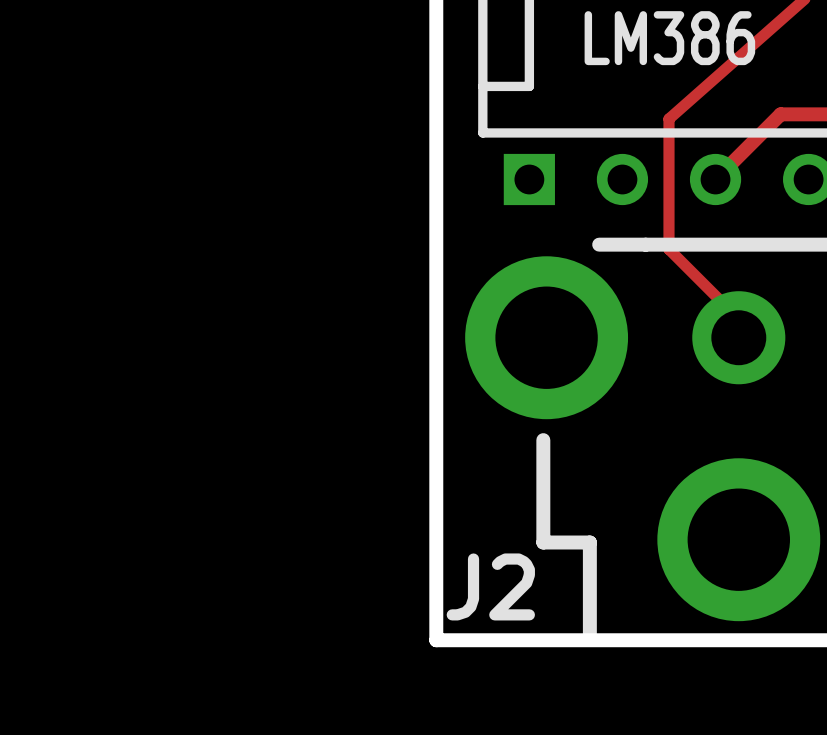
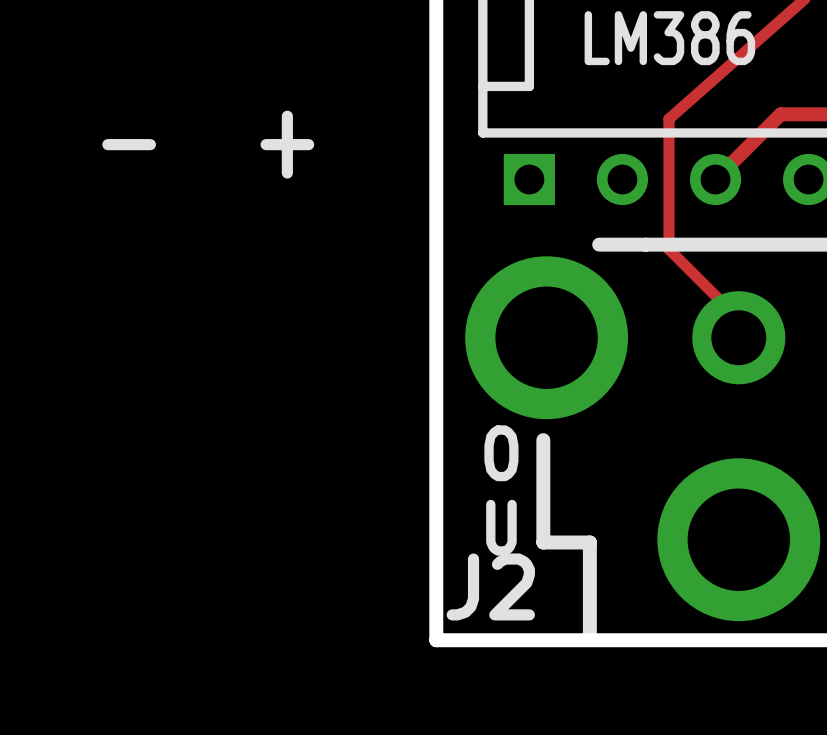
text: none -> - (129, 144)
text: none -> + (287, 144)
text: none -> O (501, 453)
text: none -> U (501, 527)

